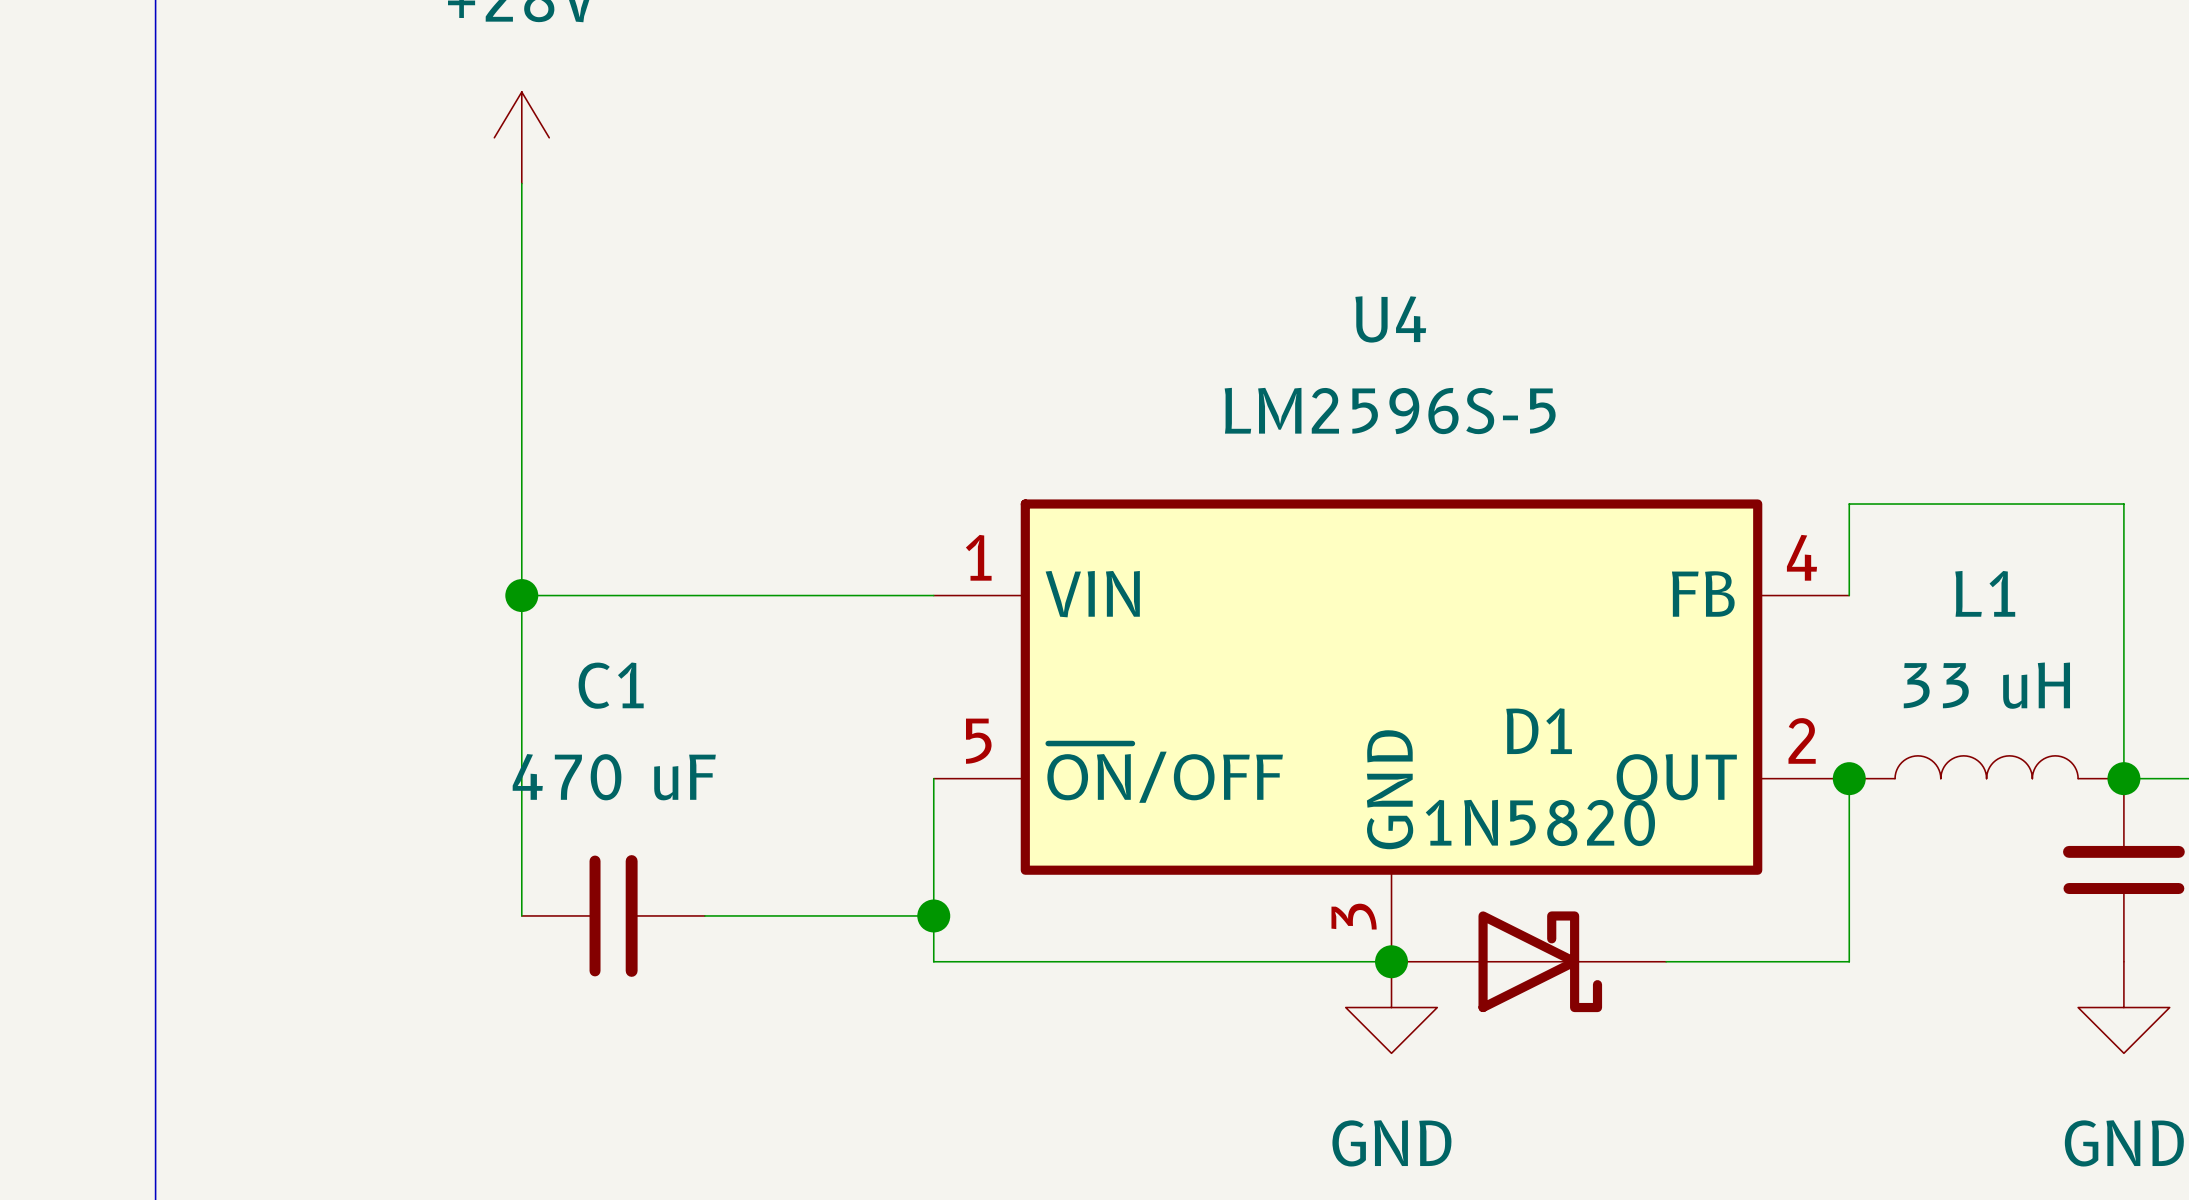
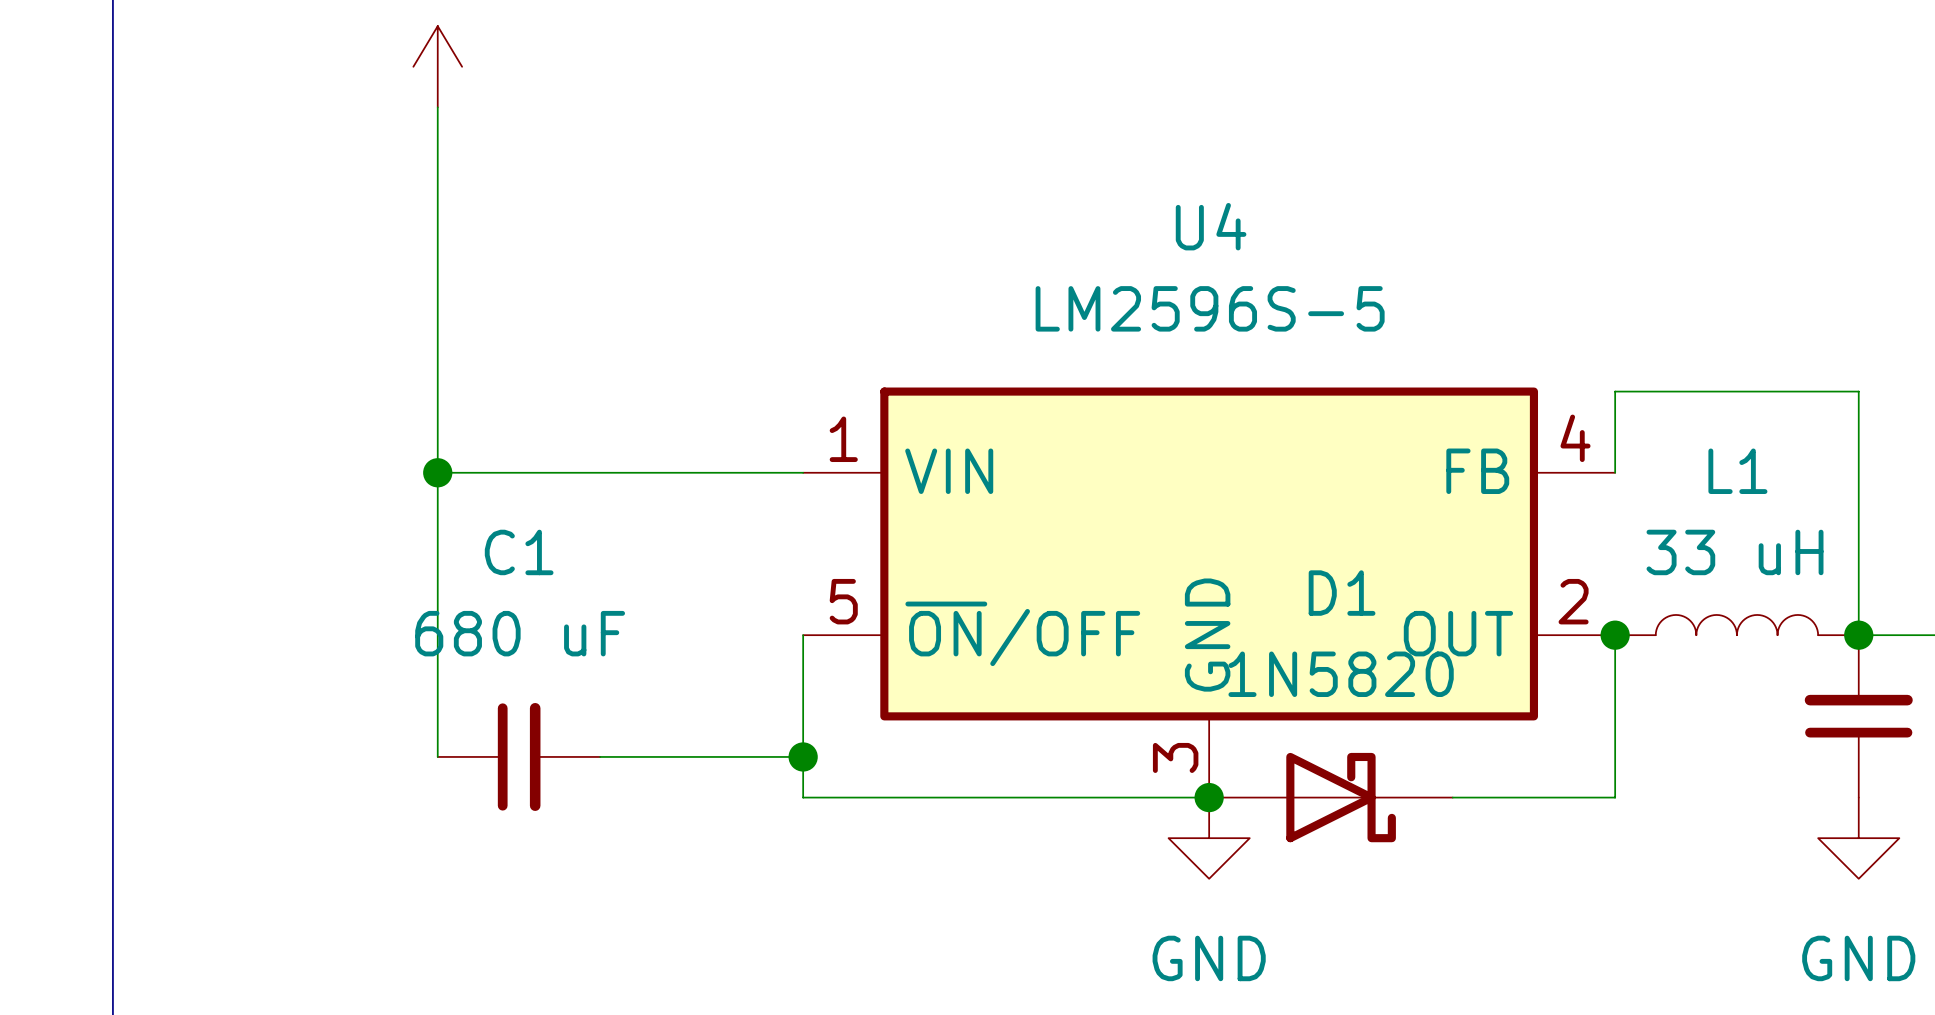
C1 value: 470 uF (614, 777) -> 680 uF (520, 633)

